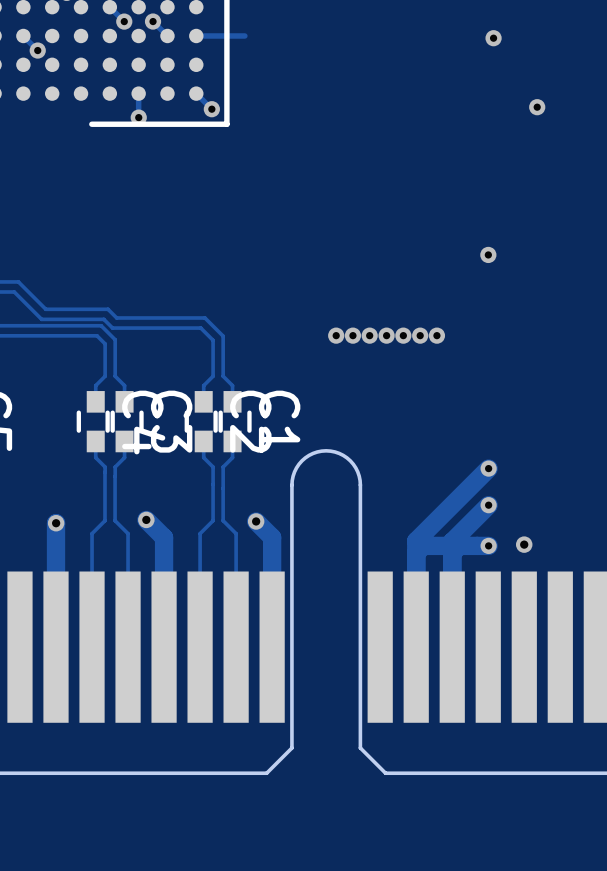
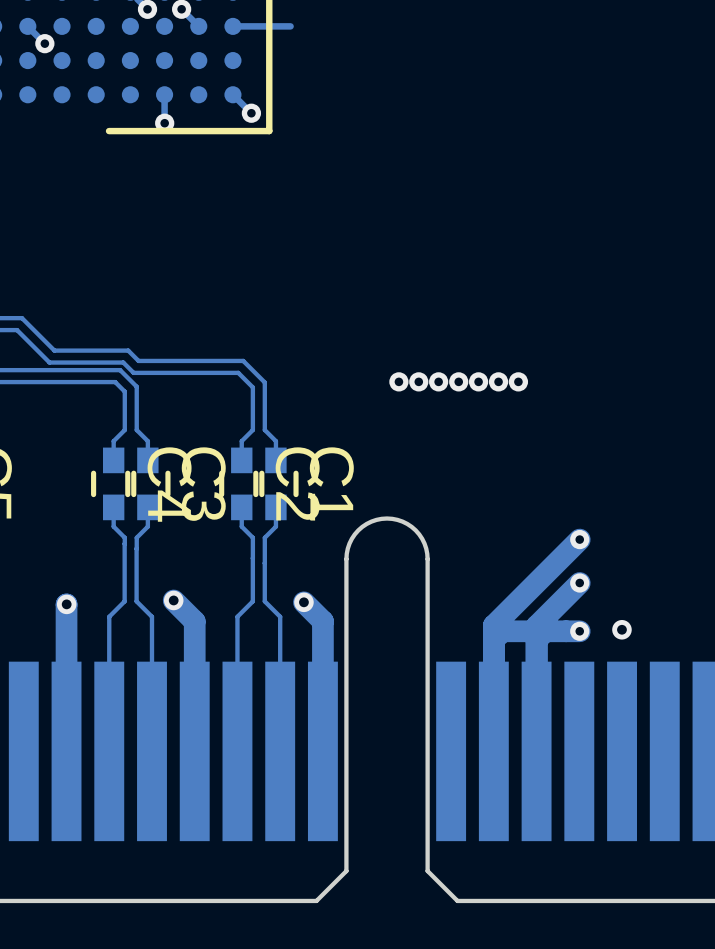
via: (493, 38) -> none
via: (537, 107) -> none
via: (488, 254) -> none

